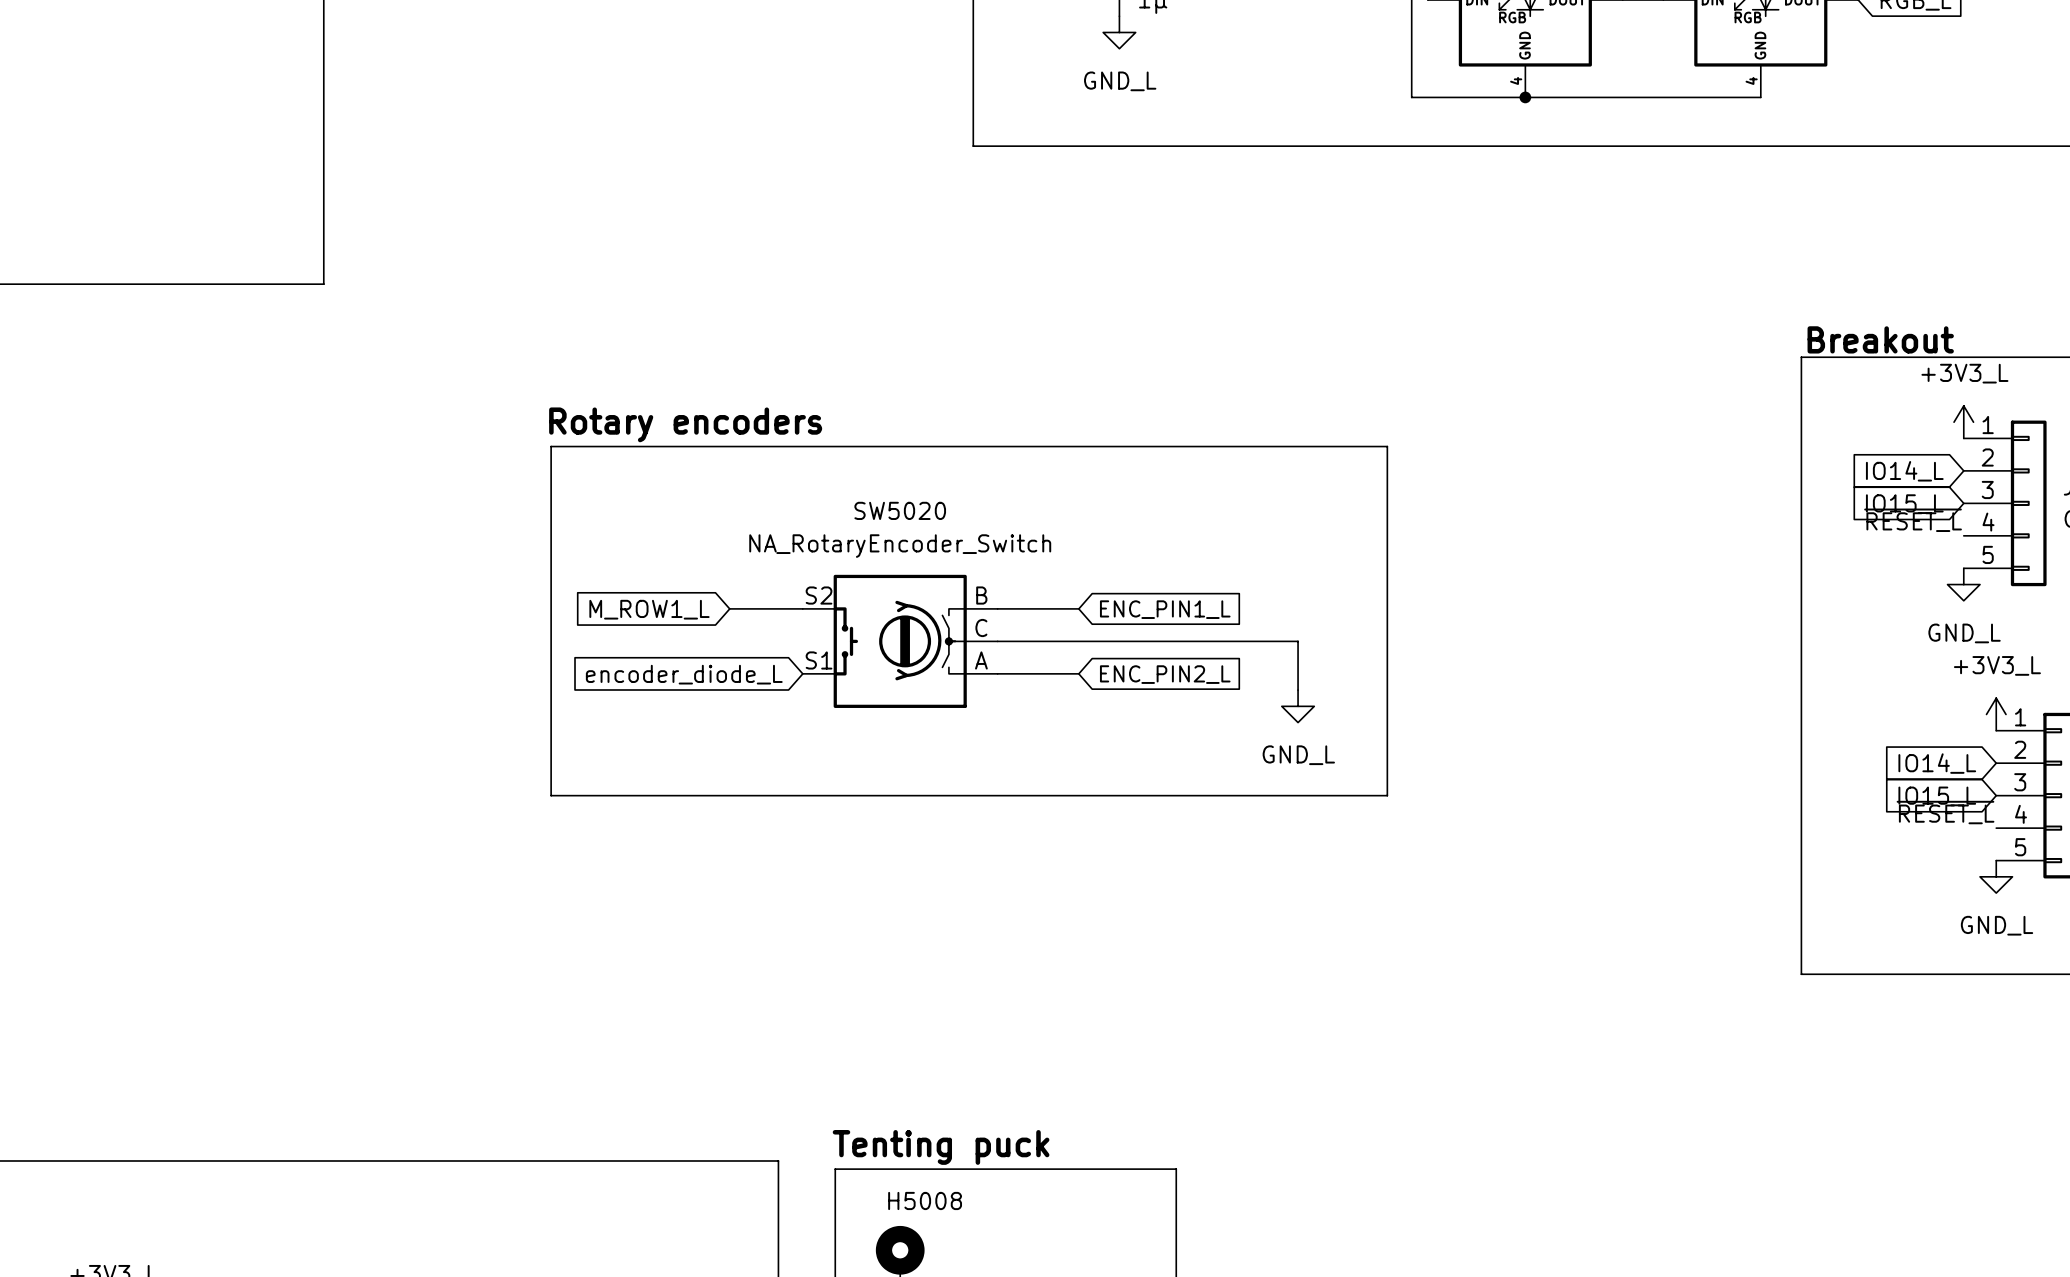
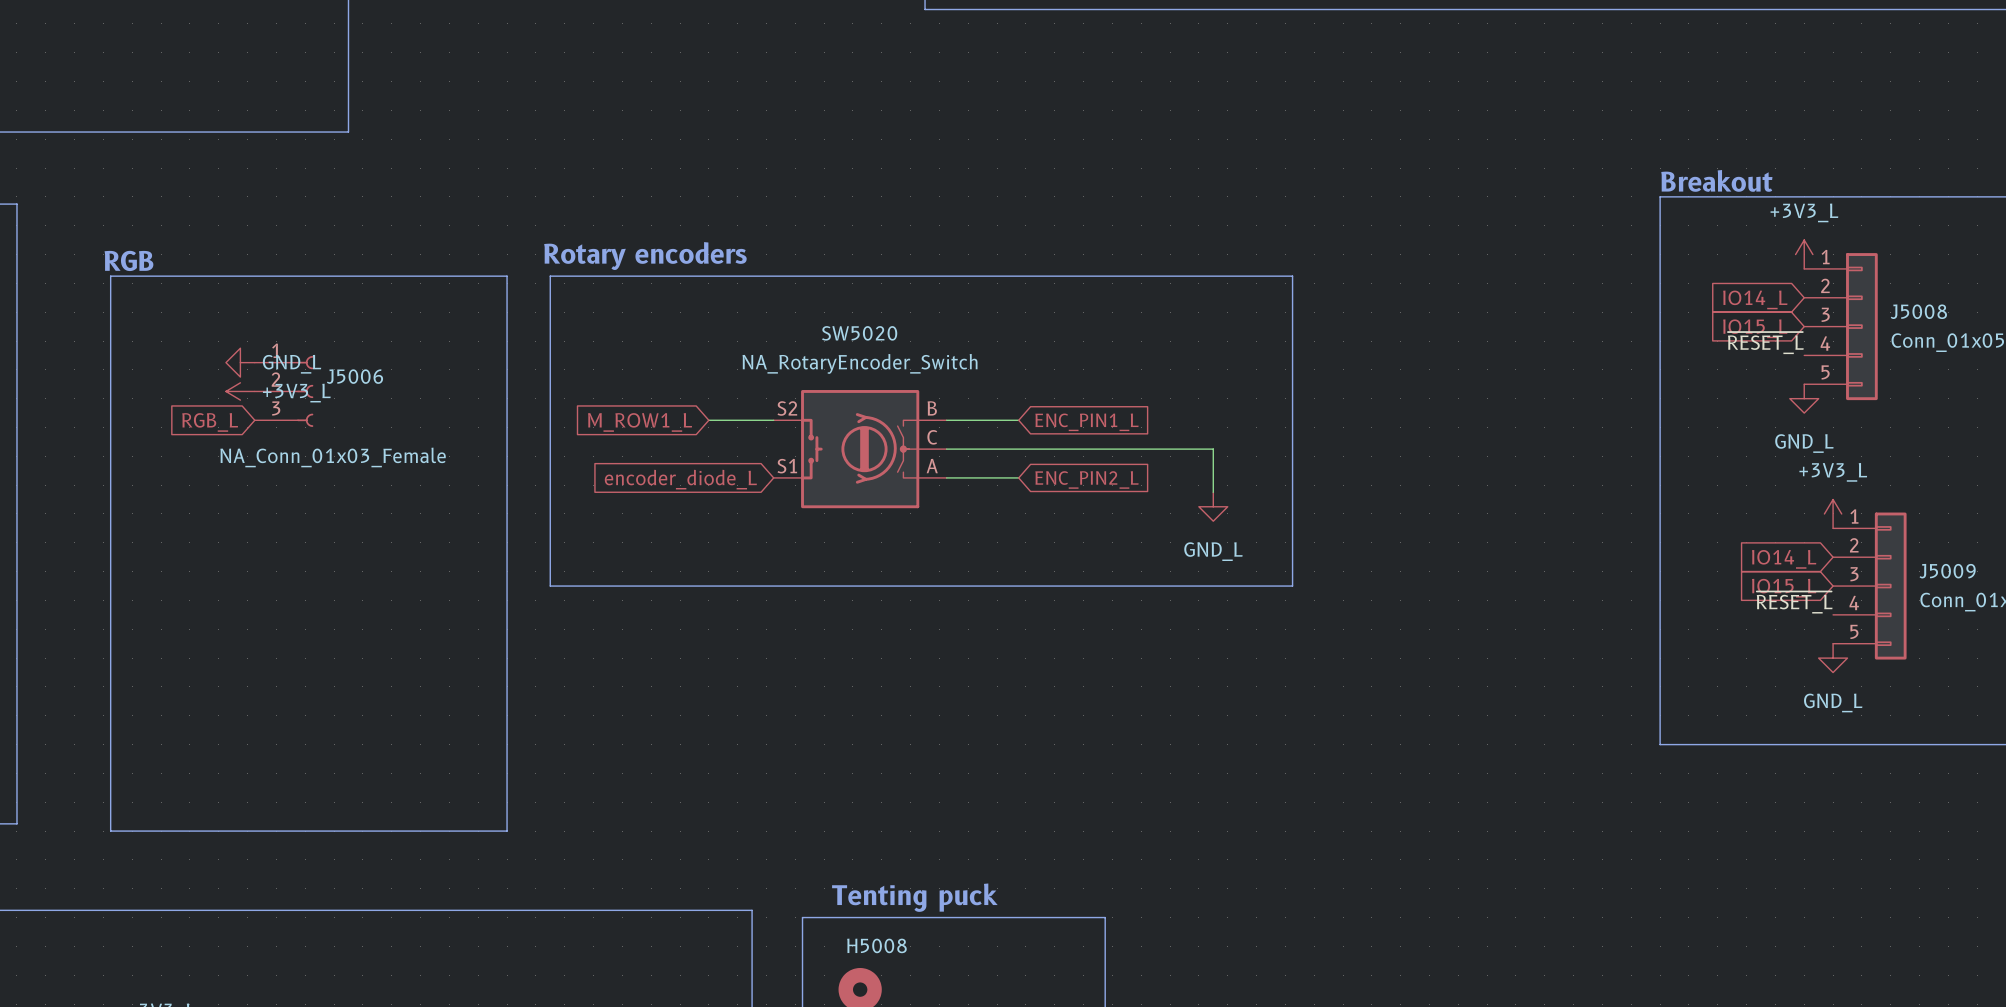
text: none -> RGB (128, 260)
line: none -> (110, 276) (110, 831) (507, 831) (507, 276) (110, 276)
power symbol: none -> GND_L (240, 362)
power symbol: none -> +3V3_L (240, 391)
J5006: none -> NA_Conn_01x03_Female (284, 391)
global label: none -> RGB_L (210, 422)

